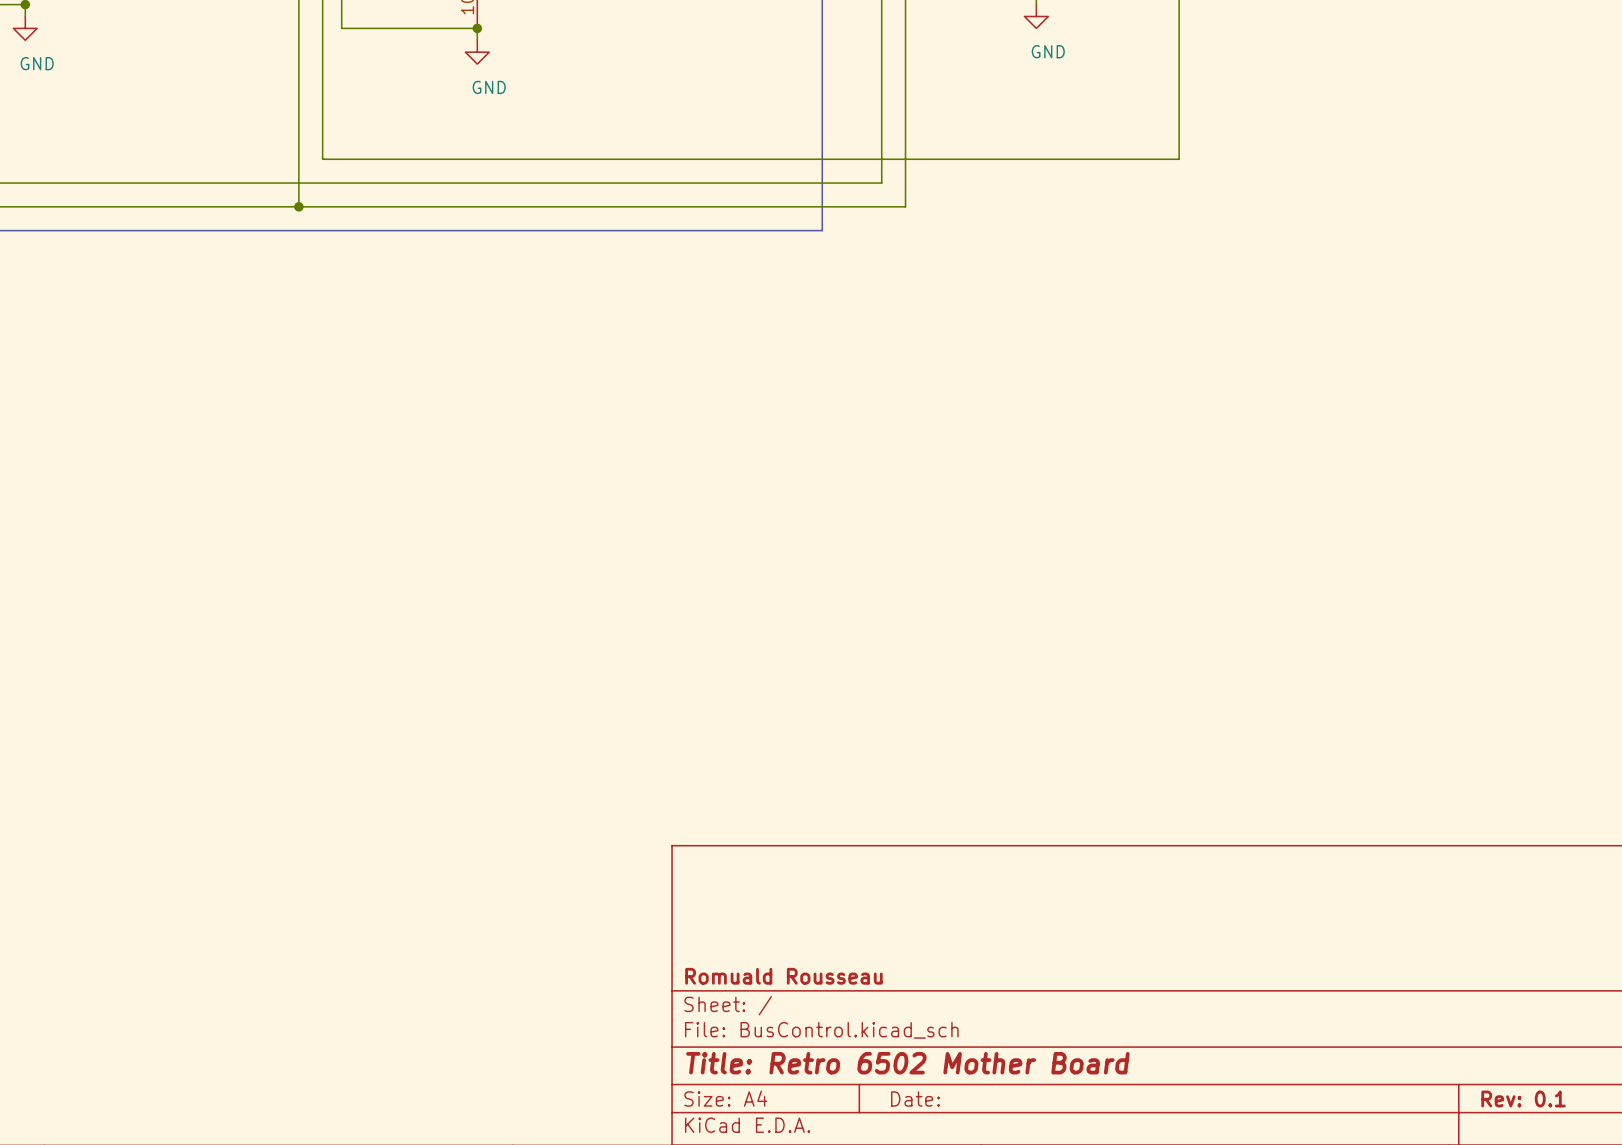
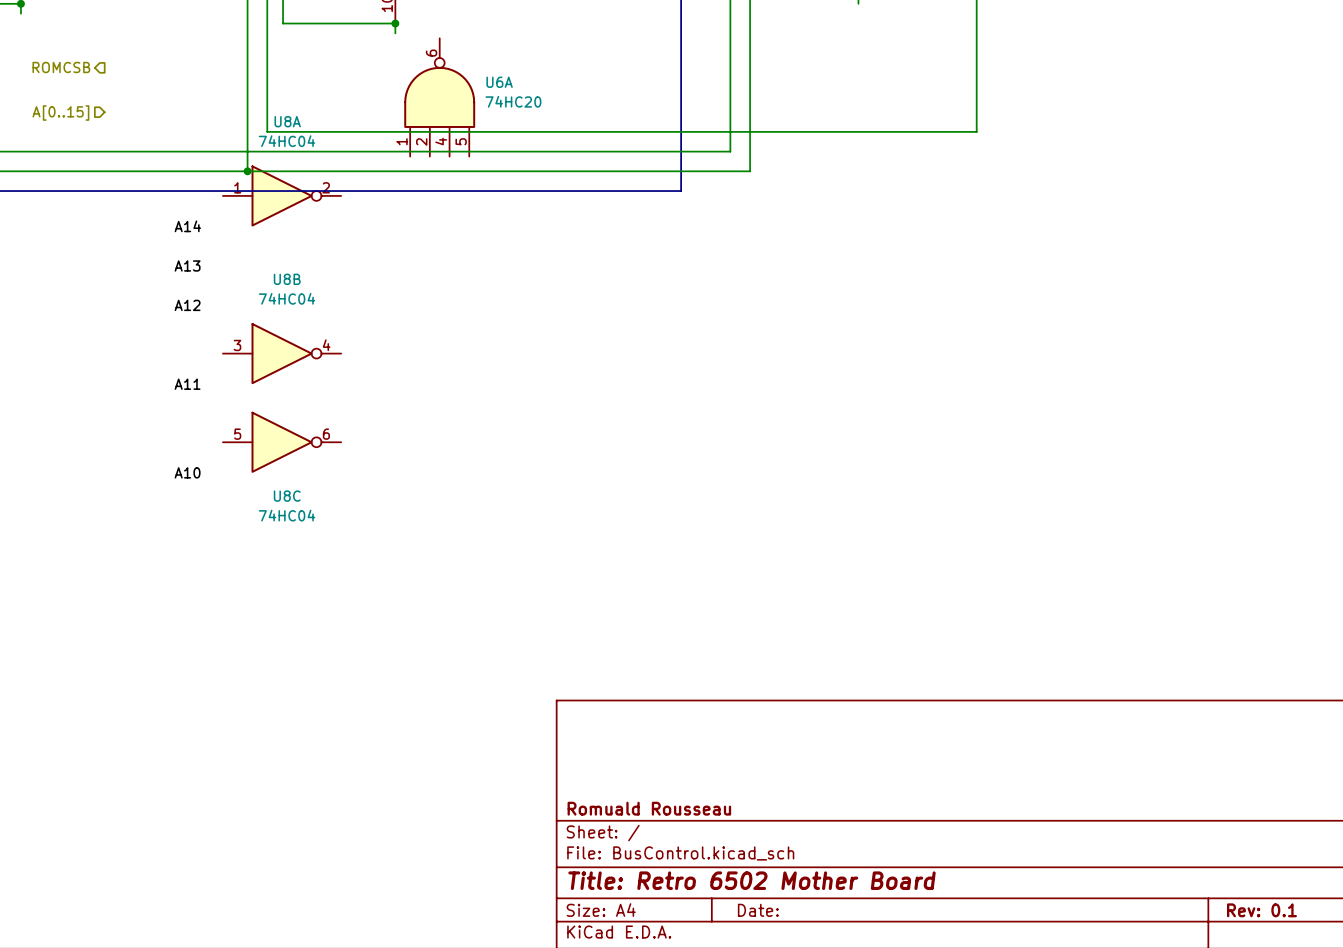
power symbol: GND (1036, 16) -> none
power symbol: GND (25, 28) -> none
power symbol: GND (477, 52) -> none
hierarchical label: none -> ROMCSB (61, 67)
U6A: none -> 74HC20 (439, 97)
hierarchical label: none -> A[0..15] (60, 113)
U8A: none -> 74HC04 (282, 195)
label: none -> A14 (187, 226)
label: none -> A13 (187, 265)
label: none -> A12 (187, 305)
U8B: none -> 74HC04 (282, 353)
label: none -> A11 (187, 384)
U8C: none -> 74HC04 (282, 442)
label: none -> A10 (187, 472)

